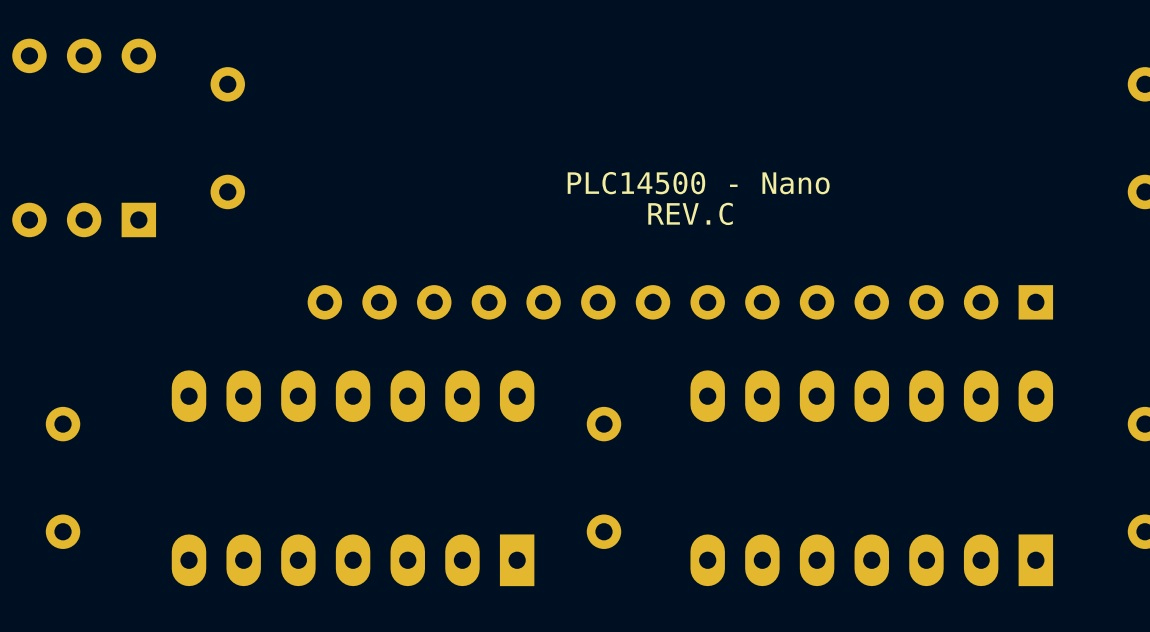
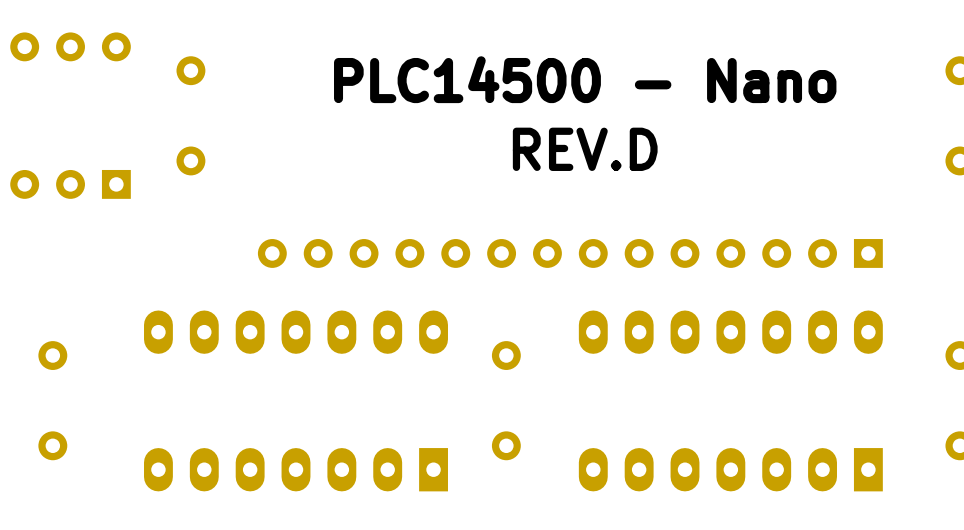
text: none -> PLC14500 - Nano (585, 79)
text: PLC14500 - Nano (698, 183) -> REV.D (585, 149)
text: REV.C (690, 213) -> none

